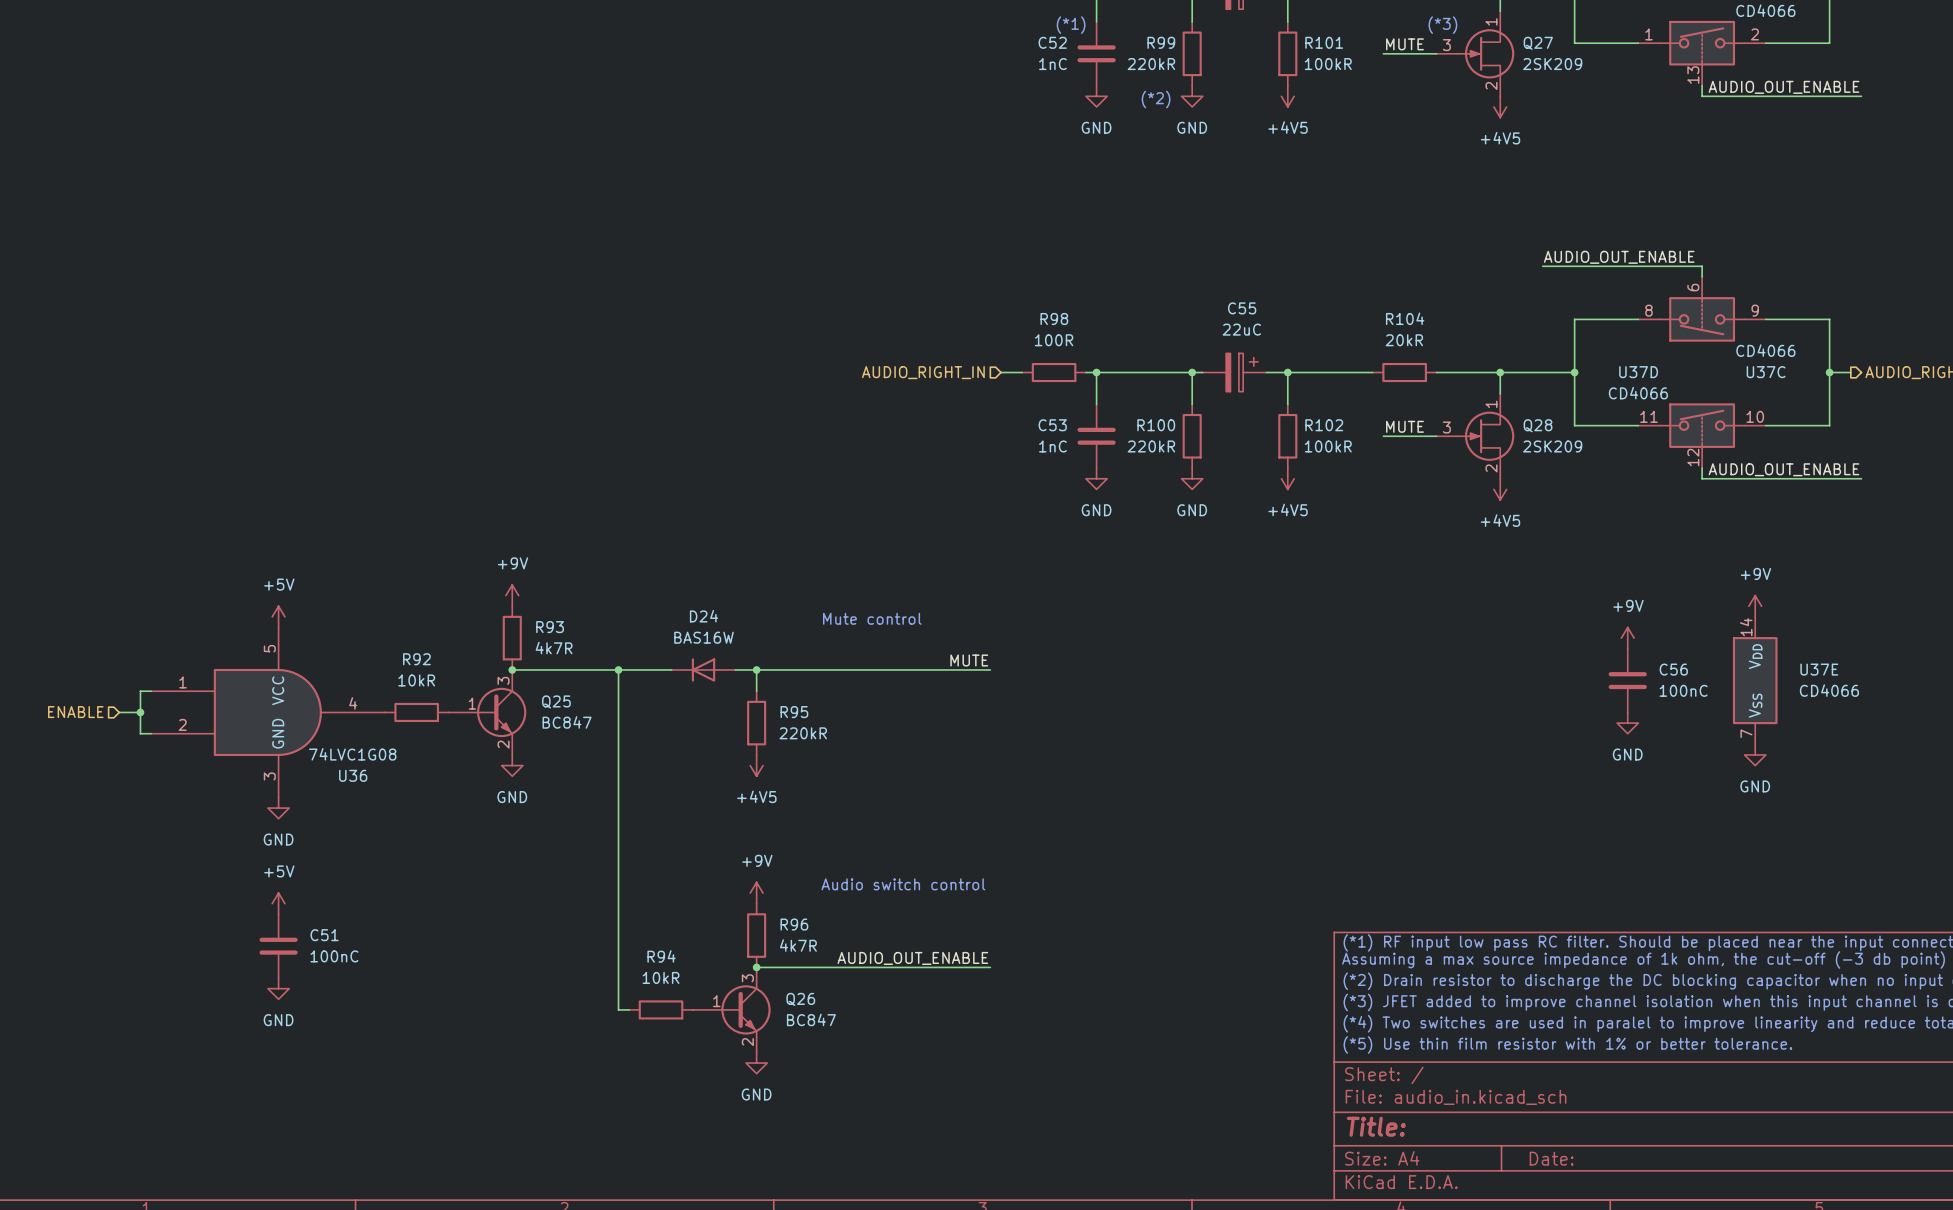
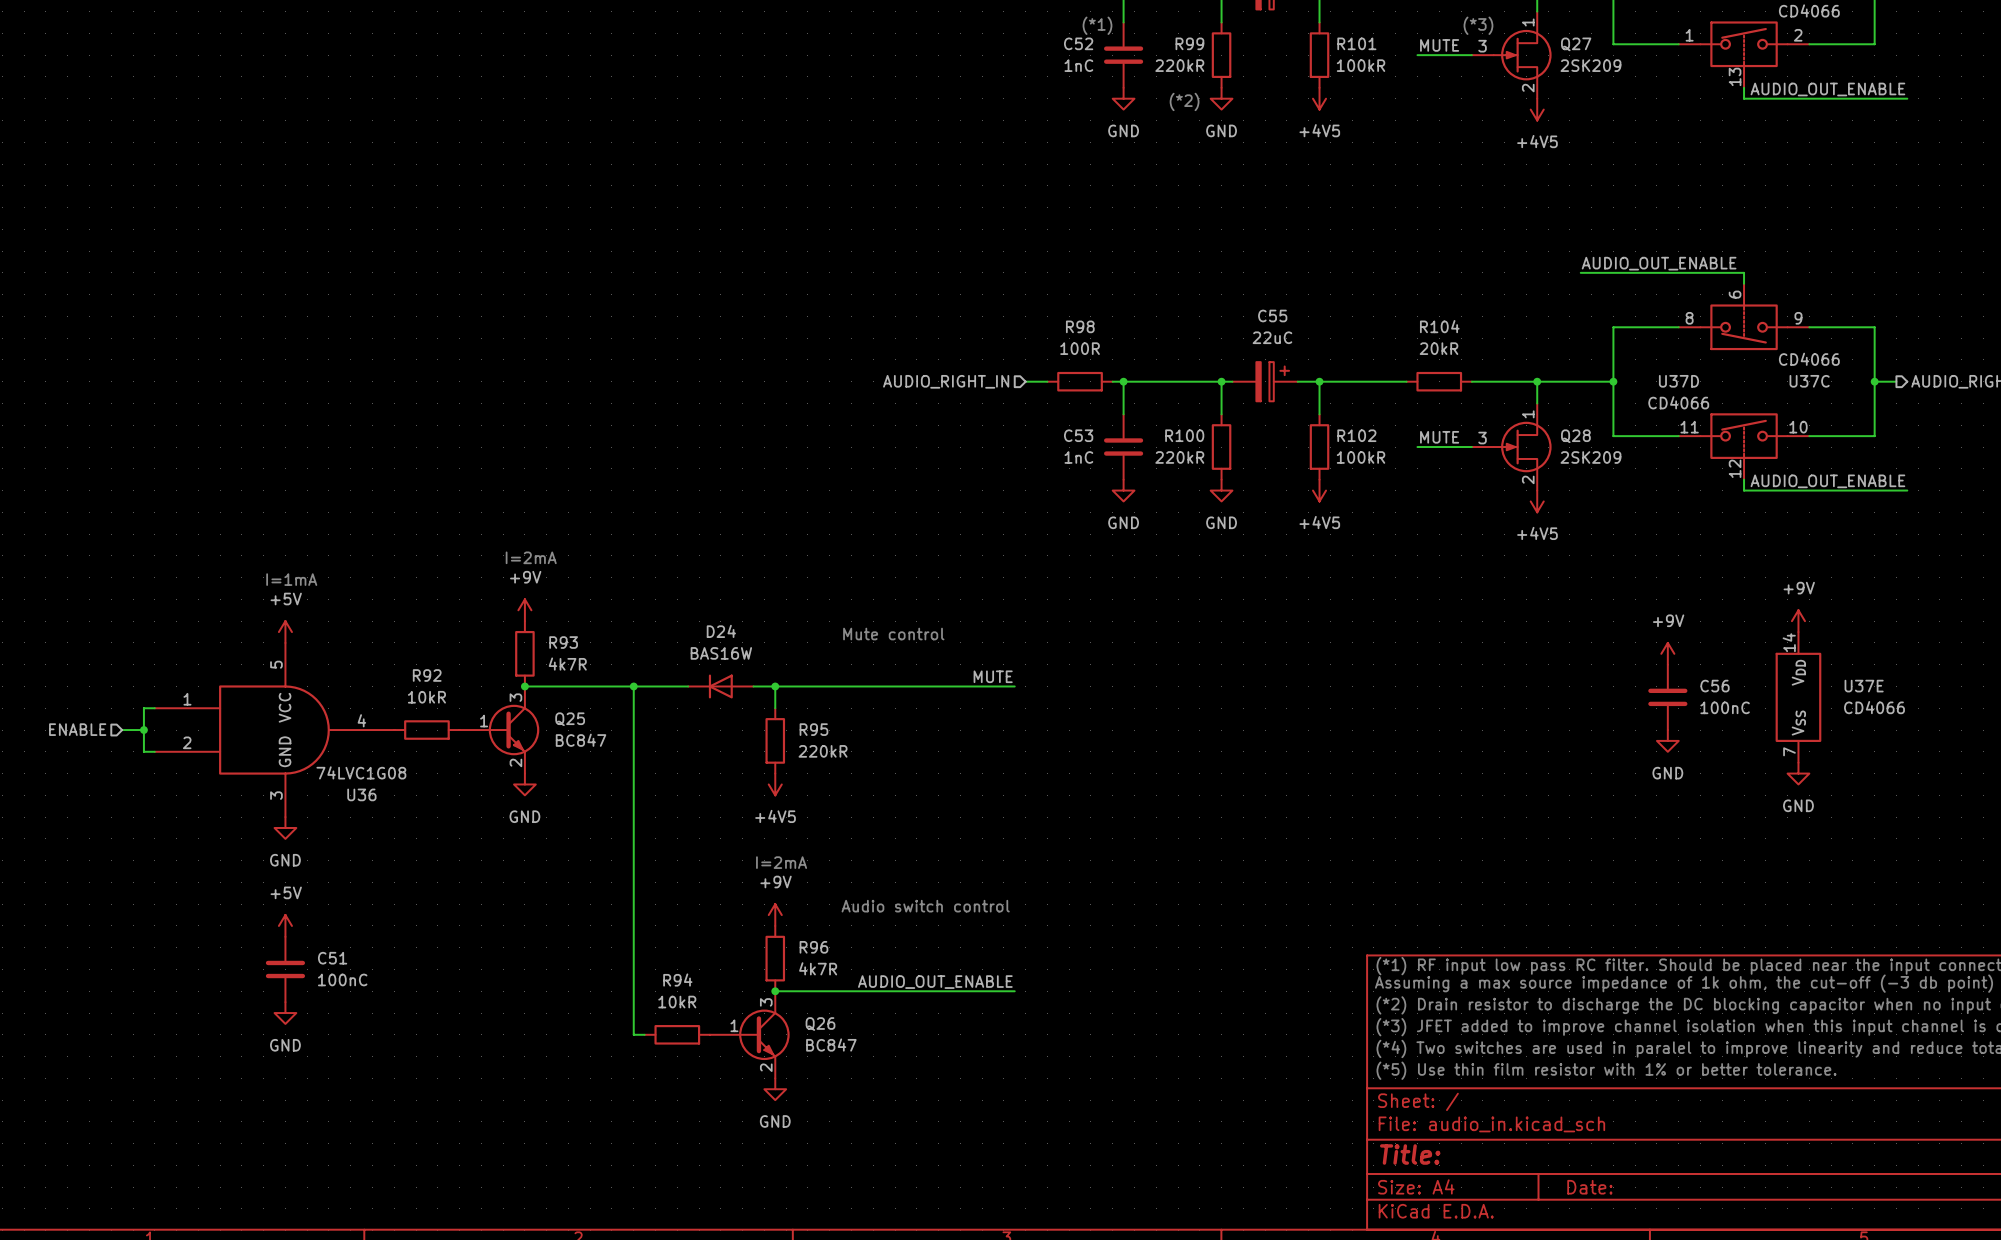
text: none -> I=2mA (531, 557)
text: none -> I=1mA (291, 579)
text: none -> I=2mA (781, 862)

